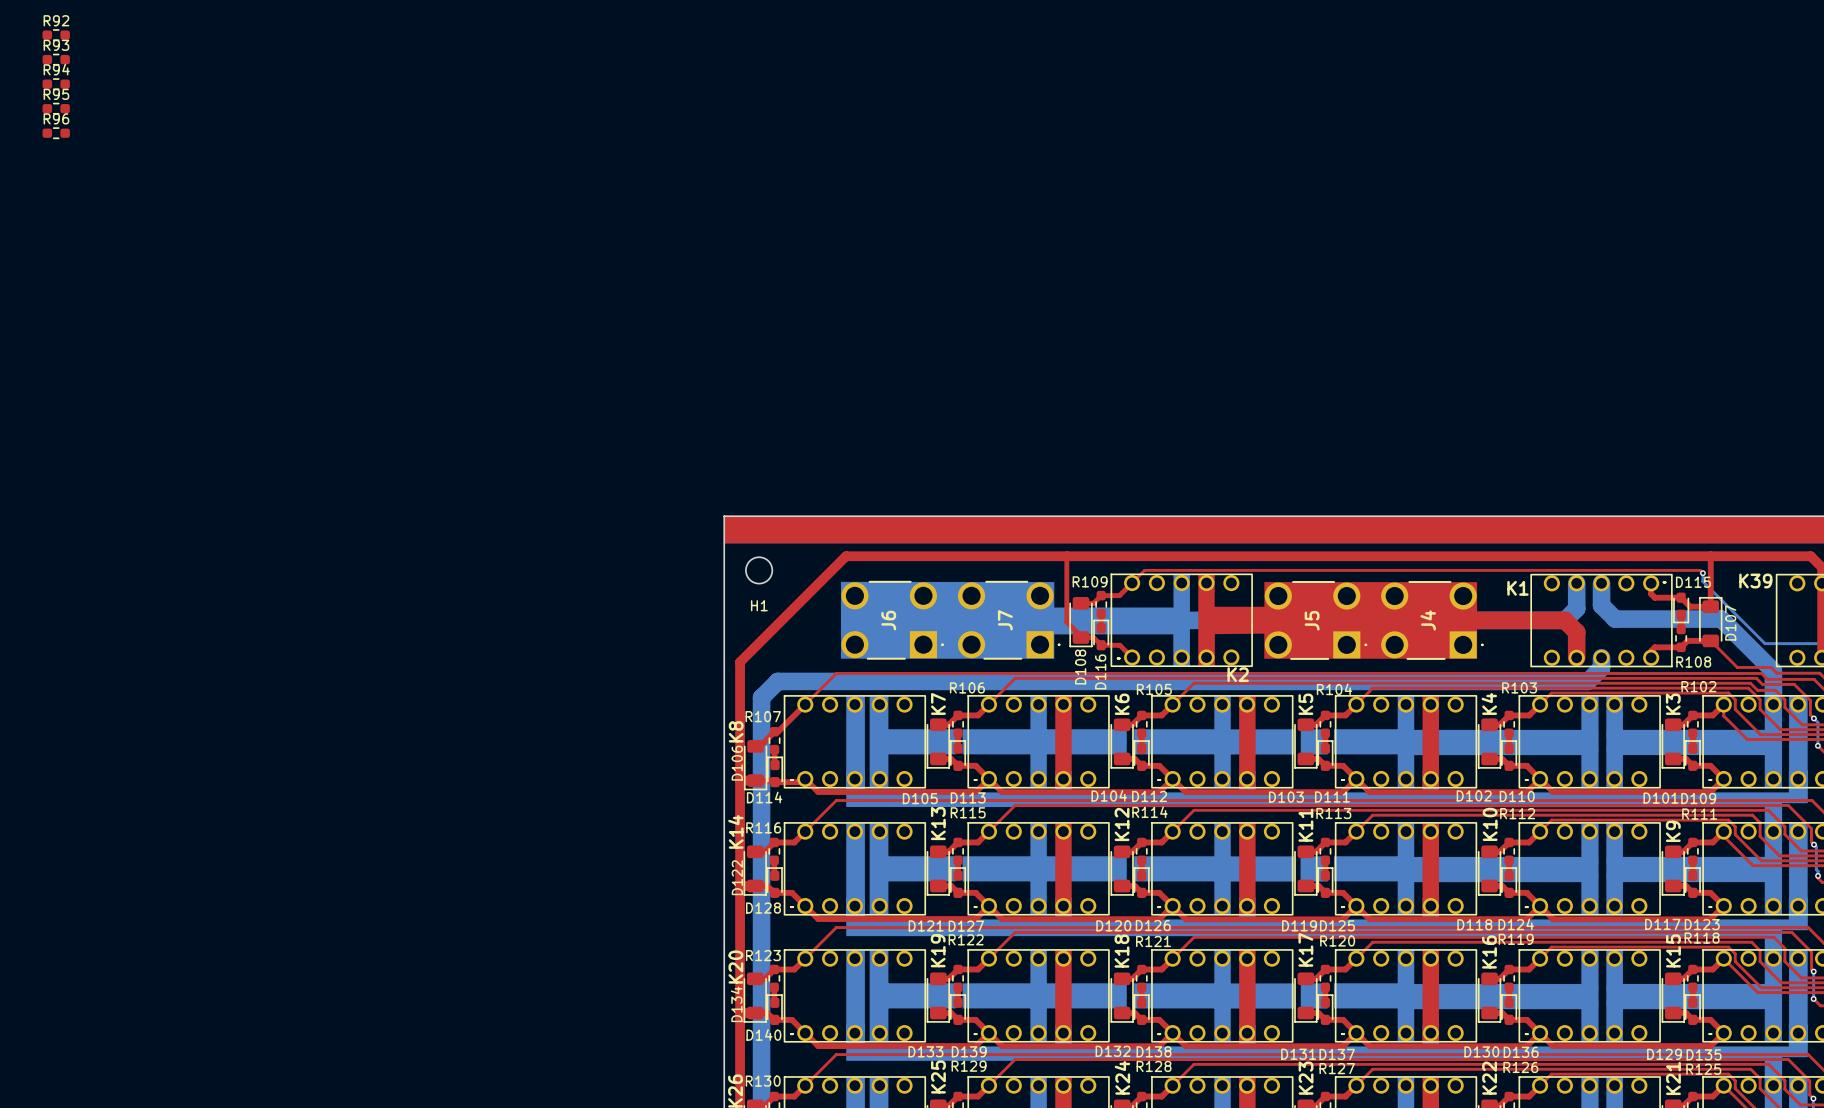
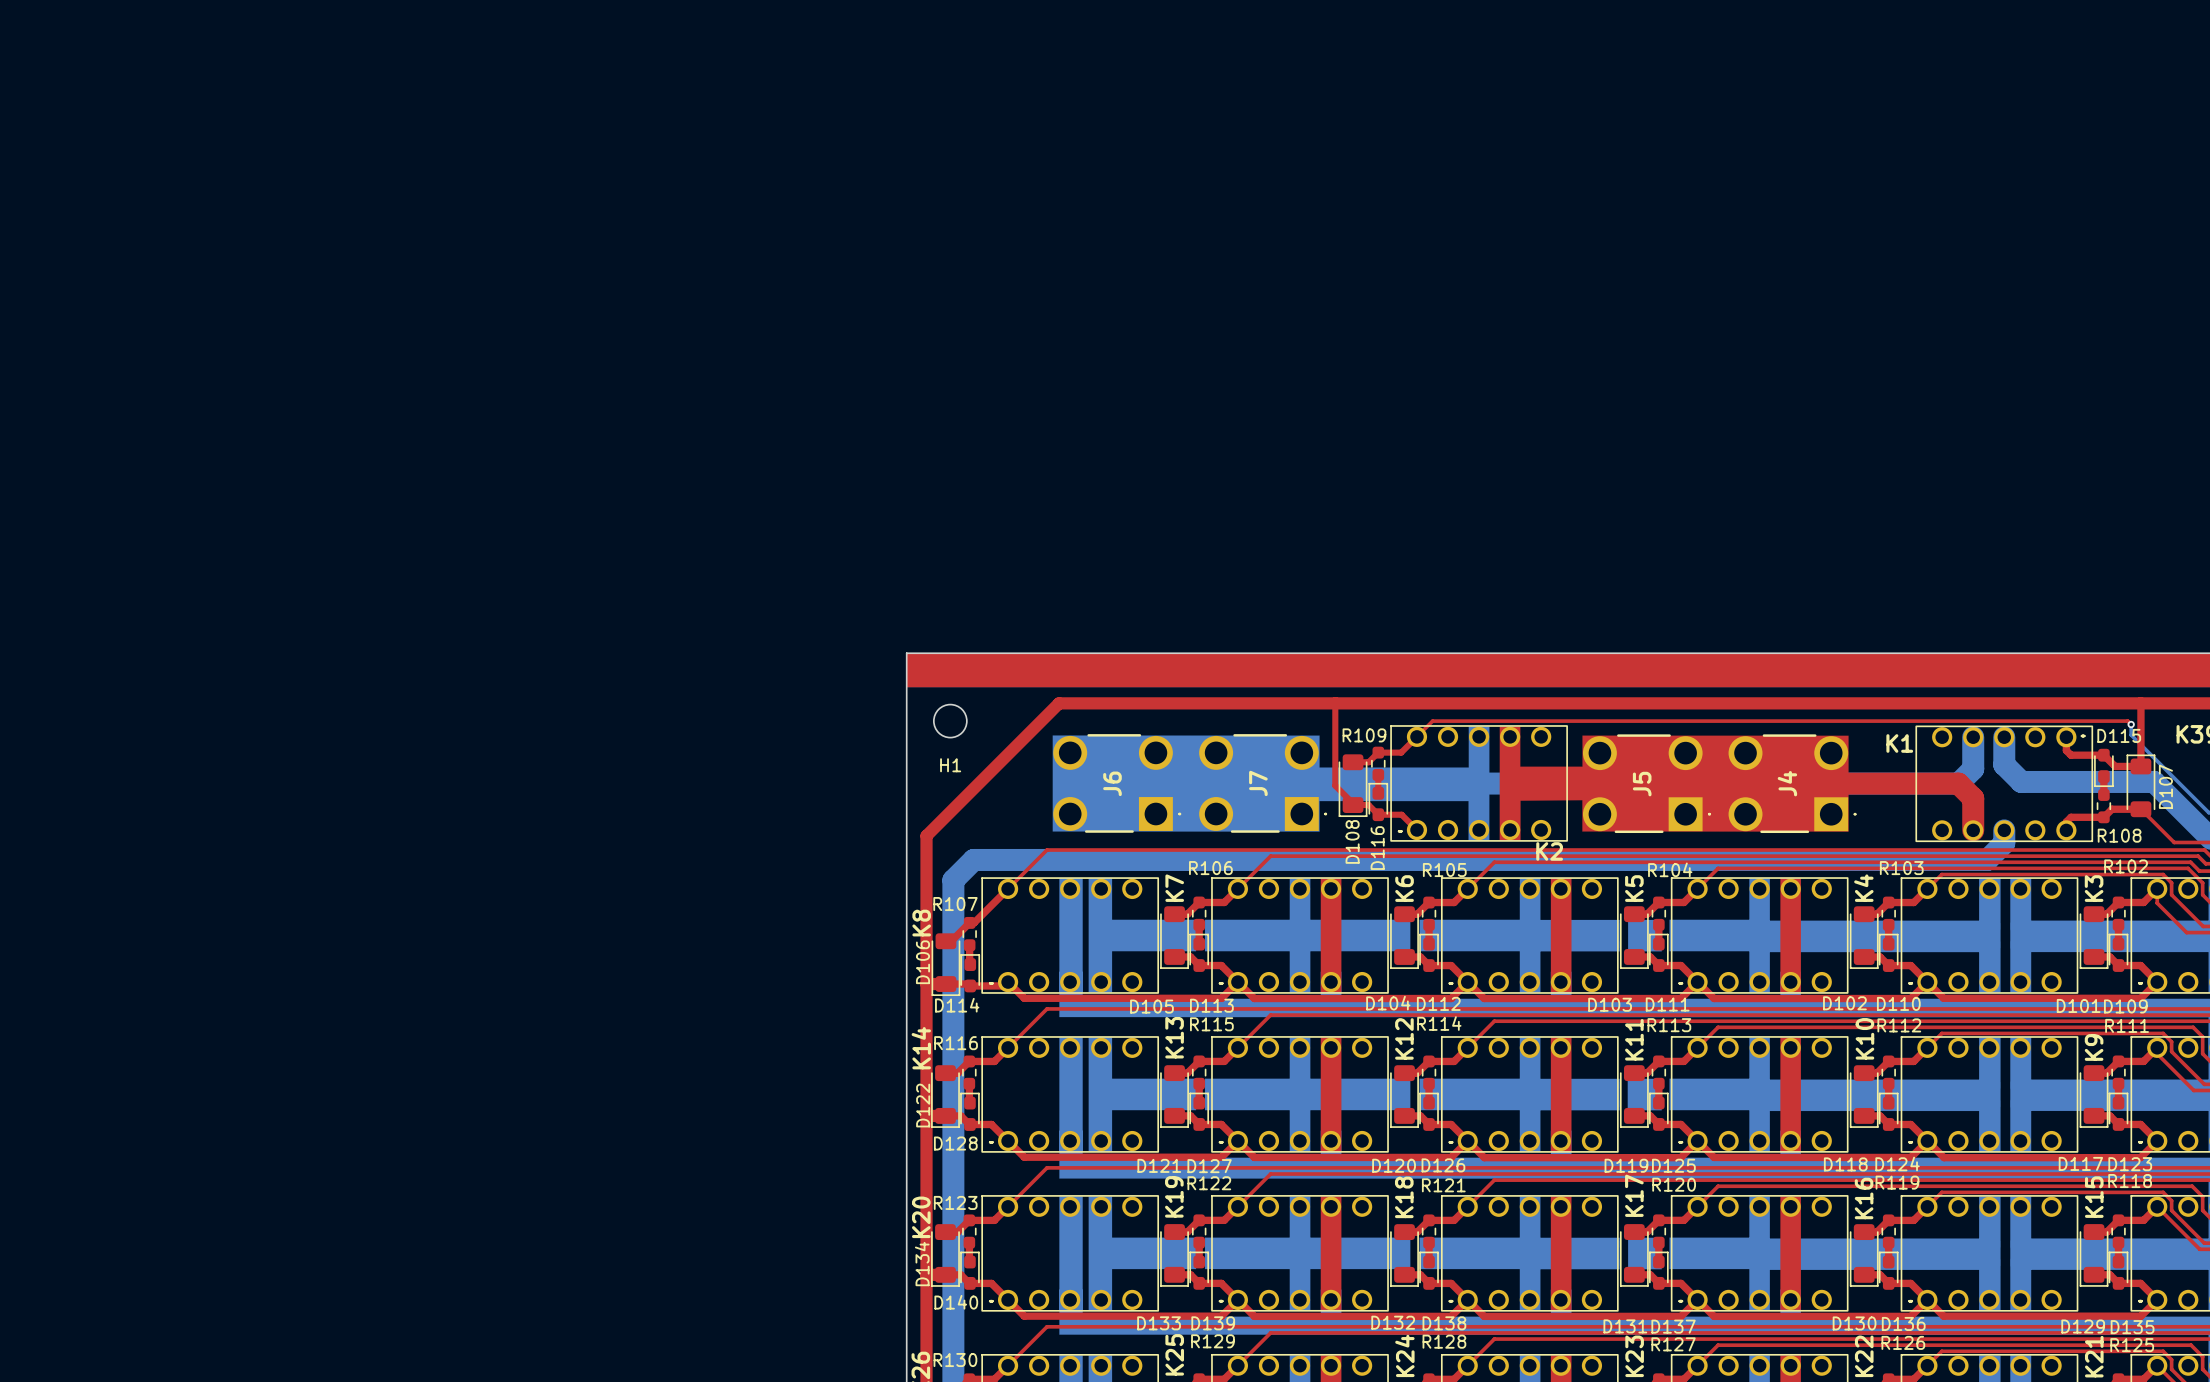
R92: (56, 35) -> none
R93: (56, 59) -> none
R94: (56, 84) -> none
R95: (56, 108) -> none
R96: (56, 133) -> none

